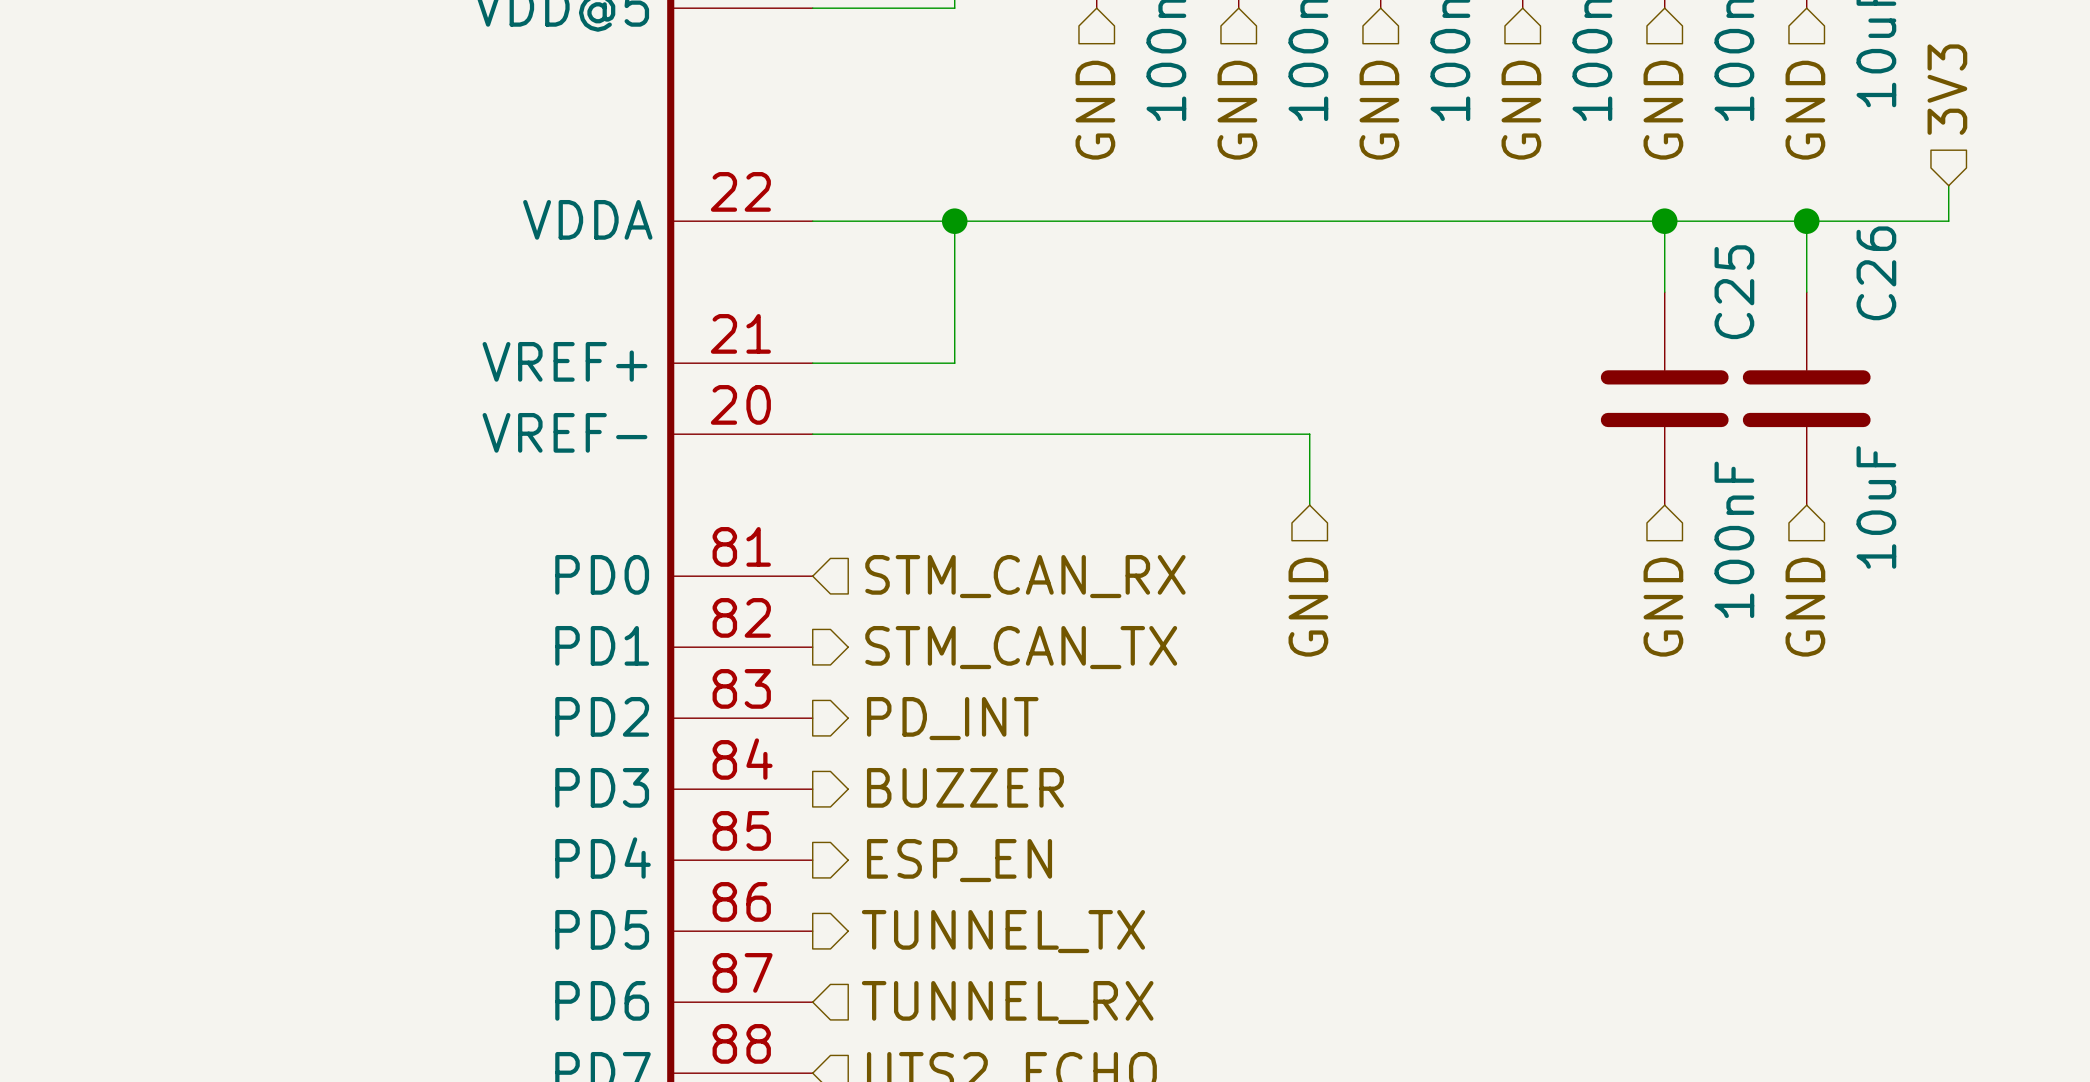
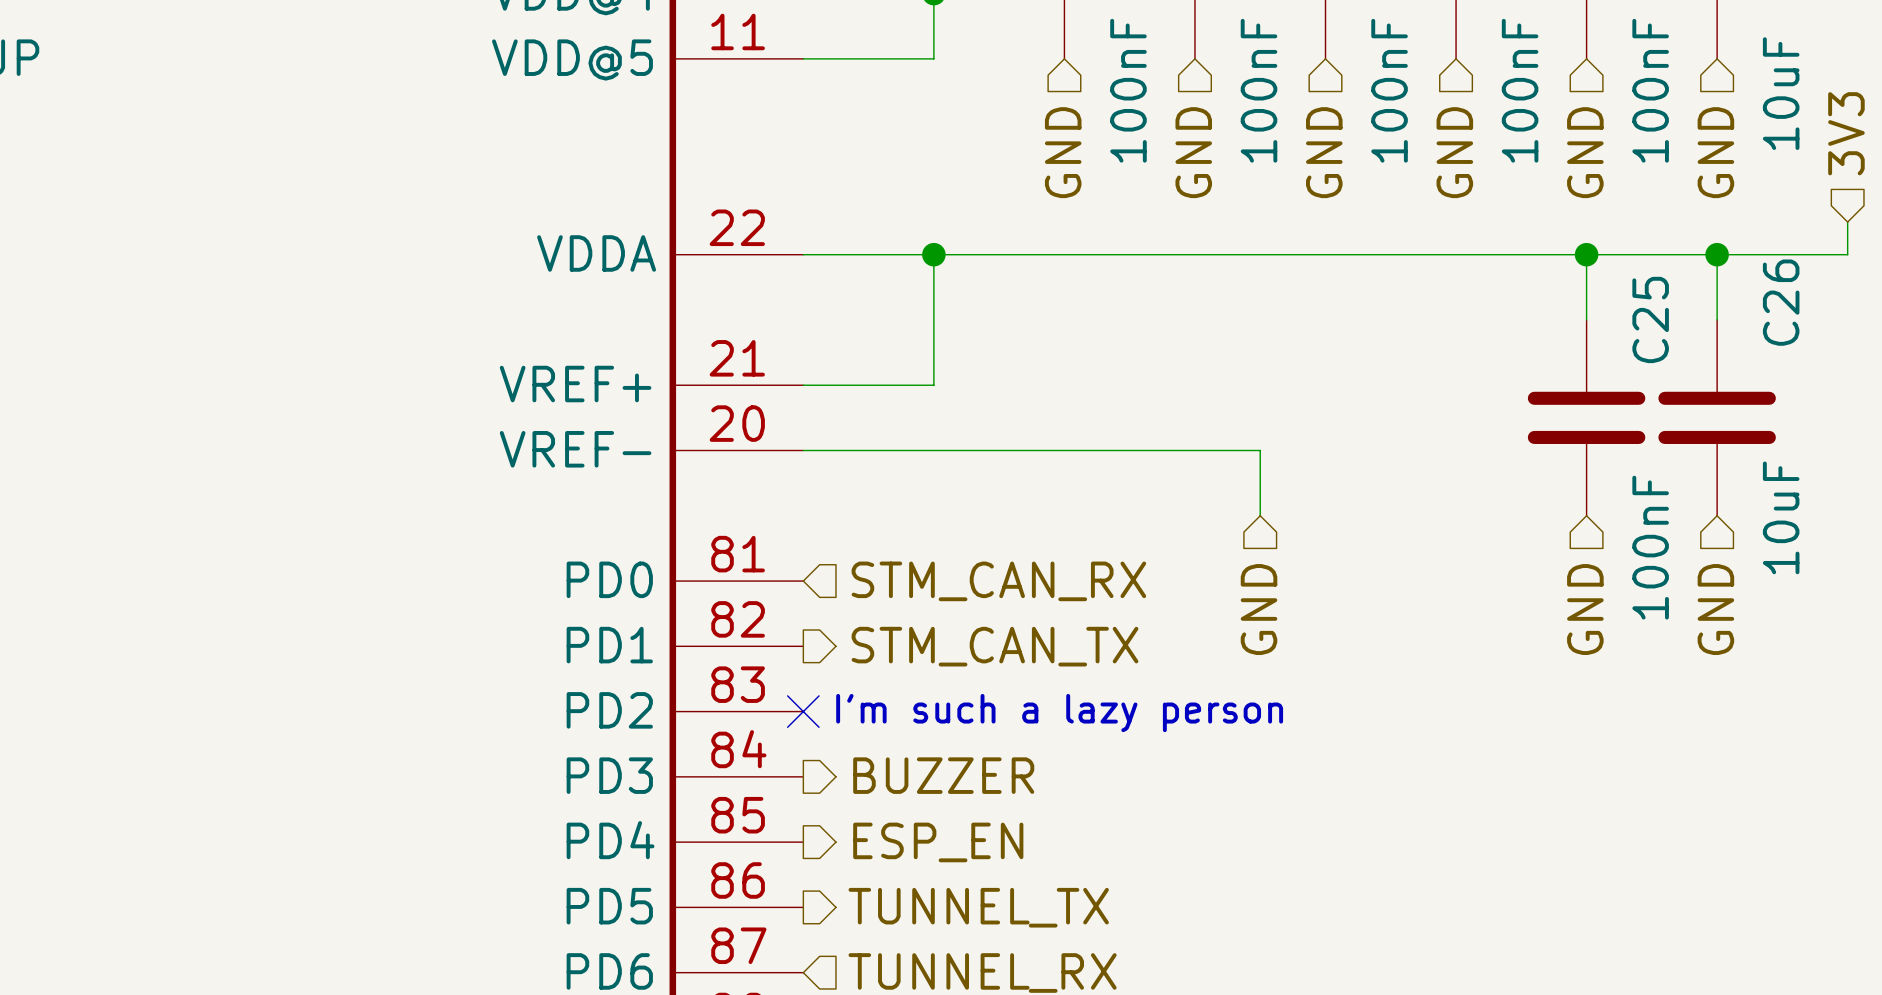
no-connect mark: none -> (803, 711)
hierarchical label: PD_INT (952, 718) -> none
text: none -> I'm such a lazy person (1059, 713)

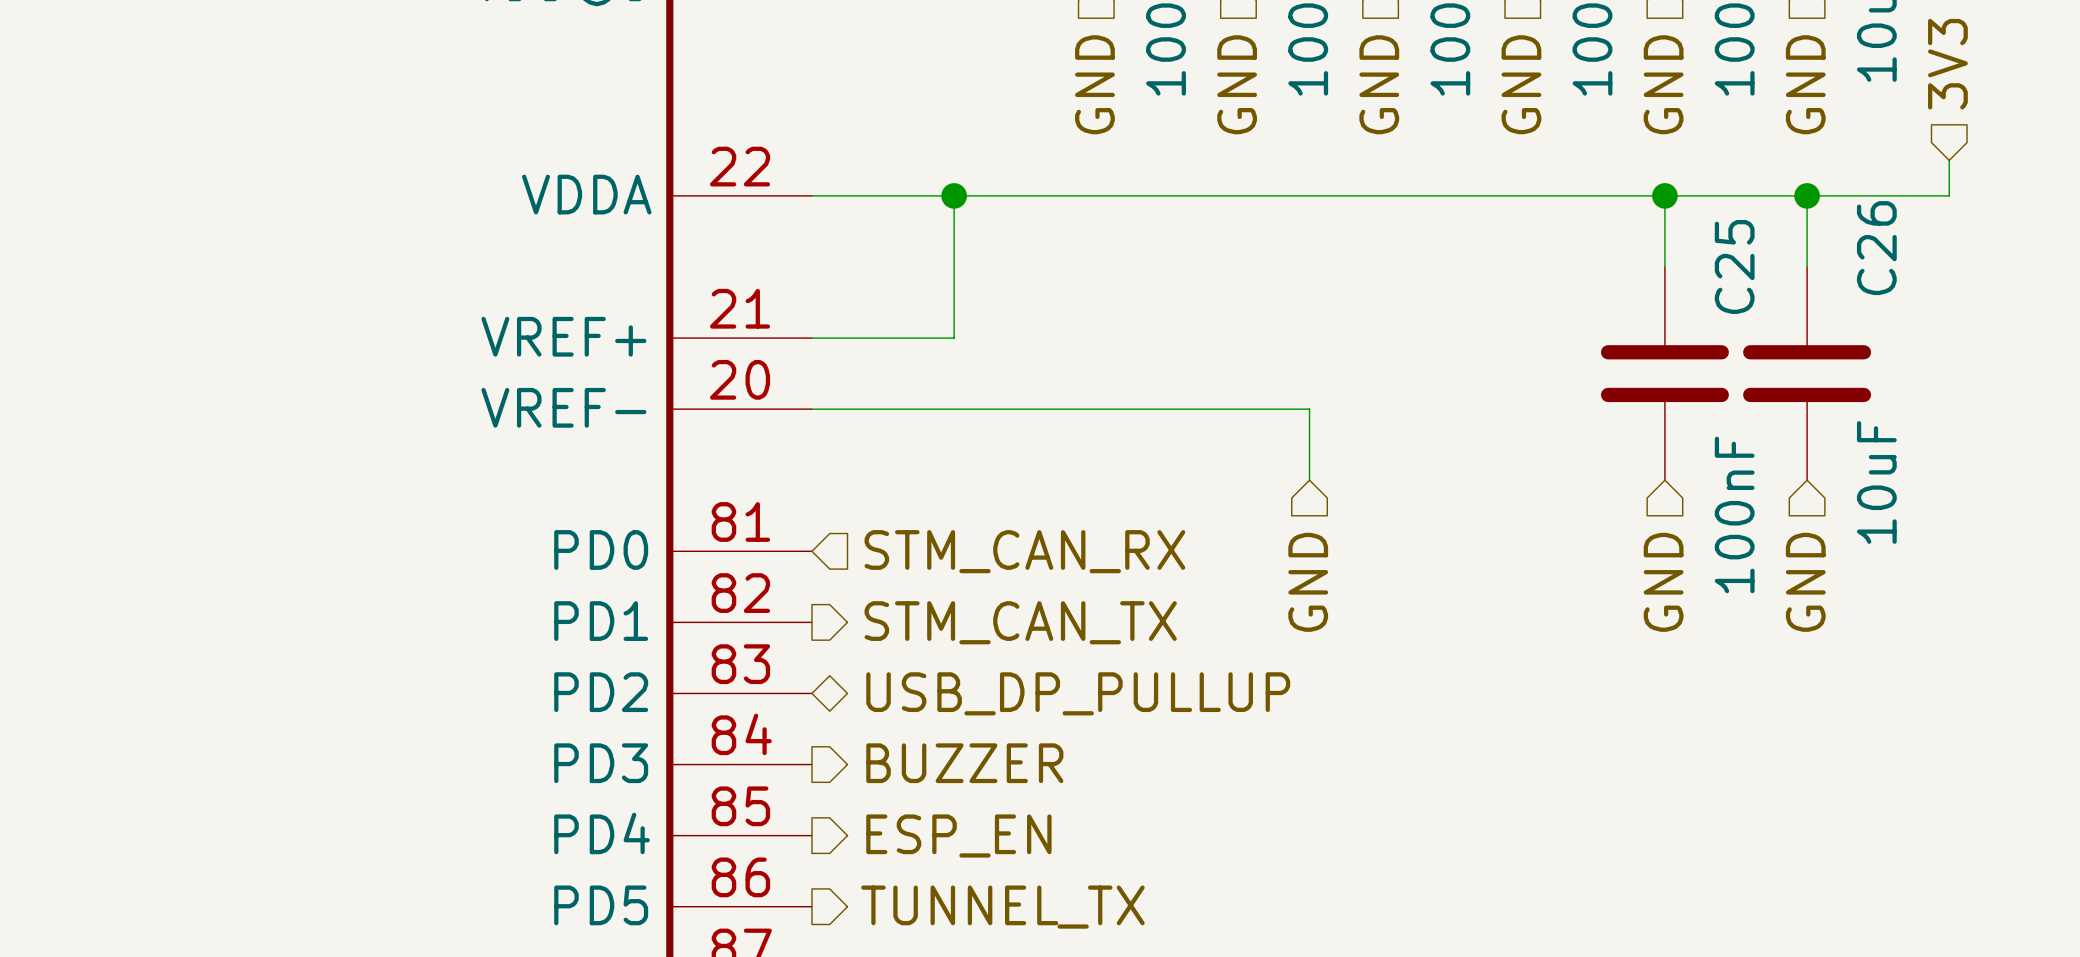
no-connect mark: (803, 711) -> none
hierarchical label: none -> USB_DP_PULLUP (1078, 693)
text: I'm such a lazy person (1059, 713) -> none

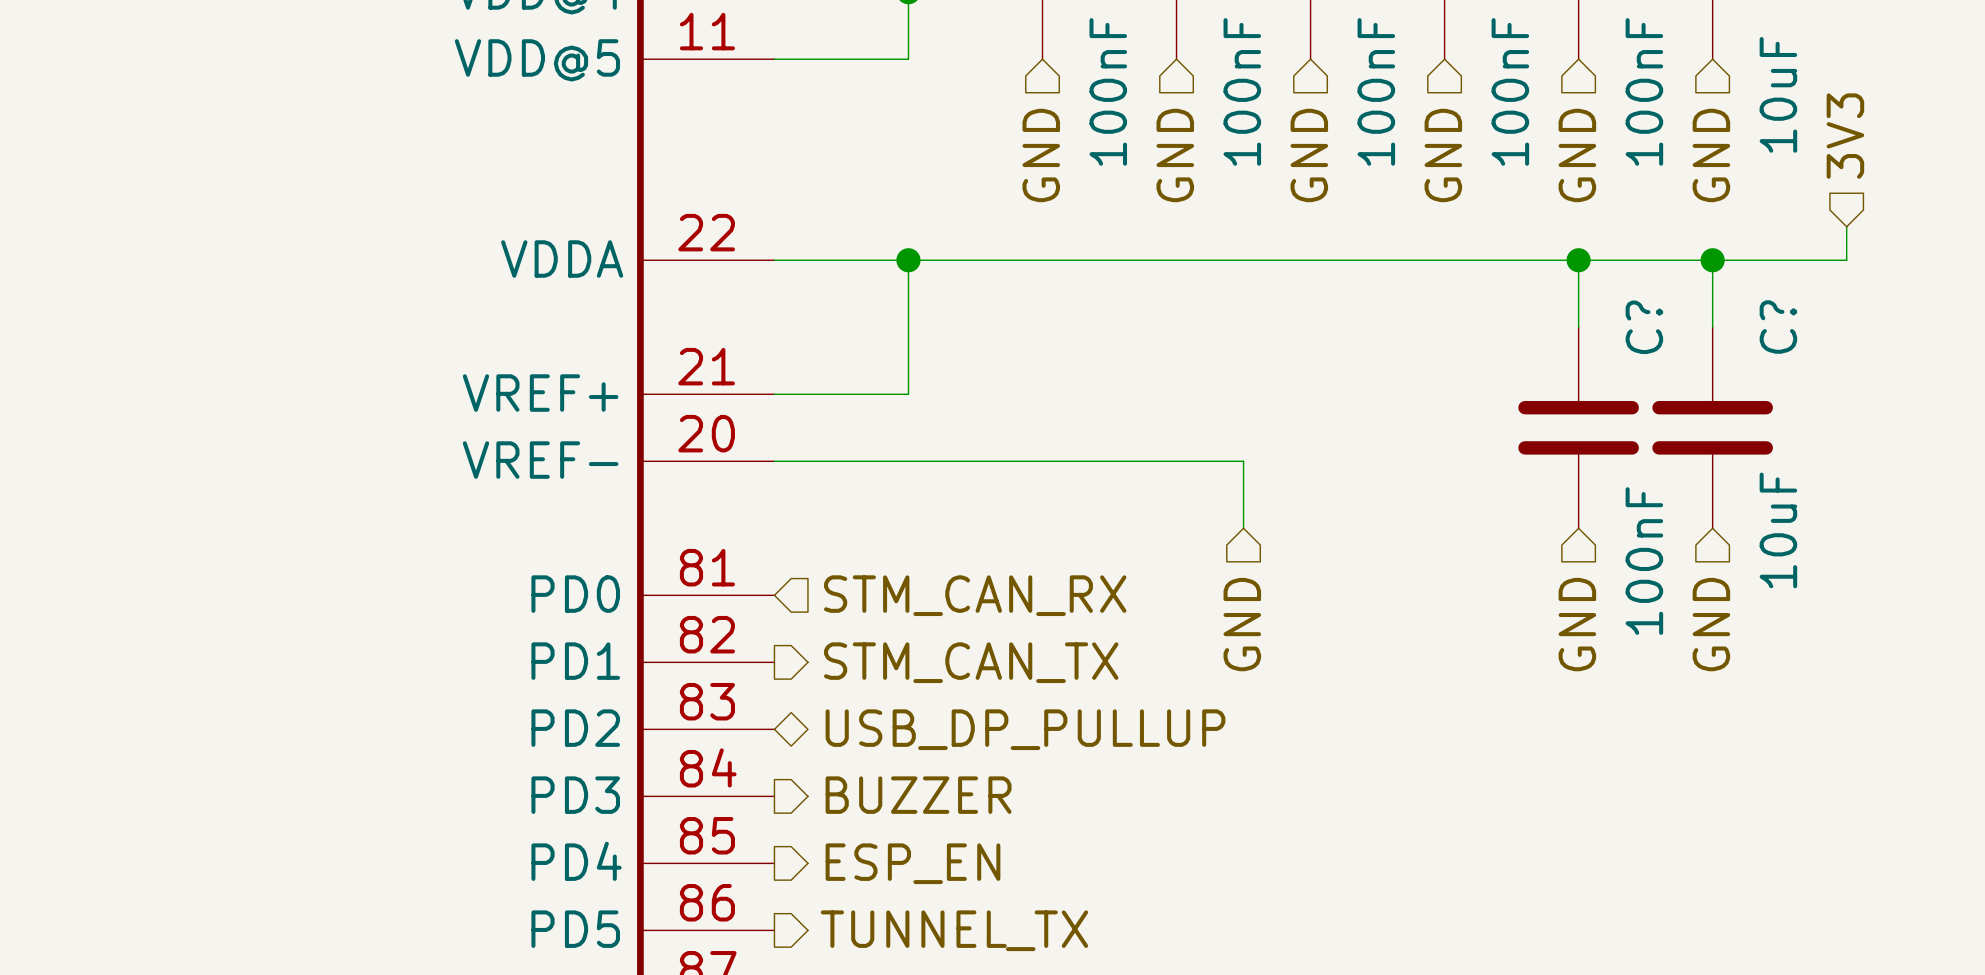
C26 name: C26 (1876, 248) -> C? (1778, 327)
C25 name: C25 (1734, 266) -> C? (1644, 327)

